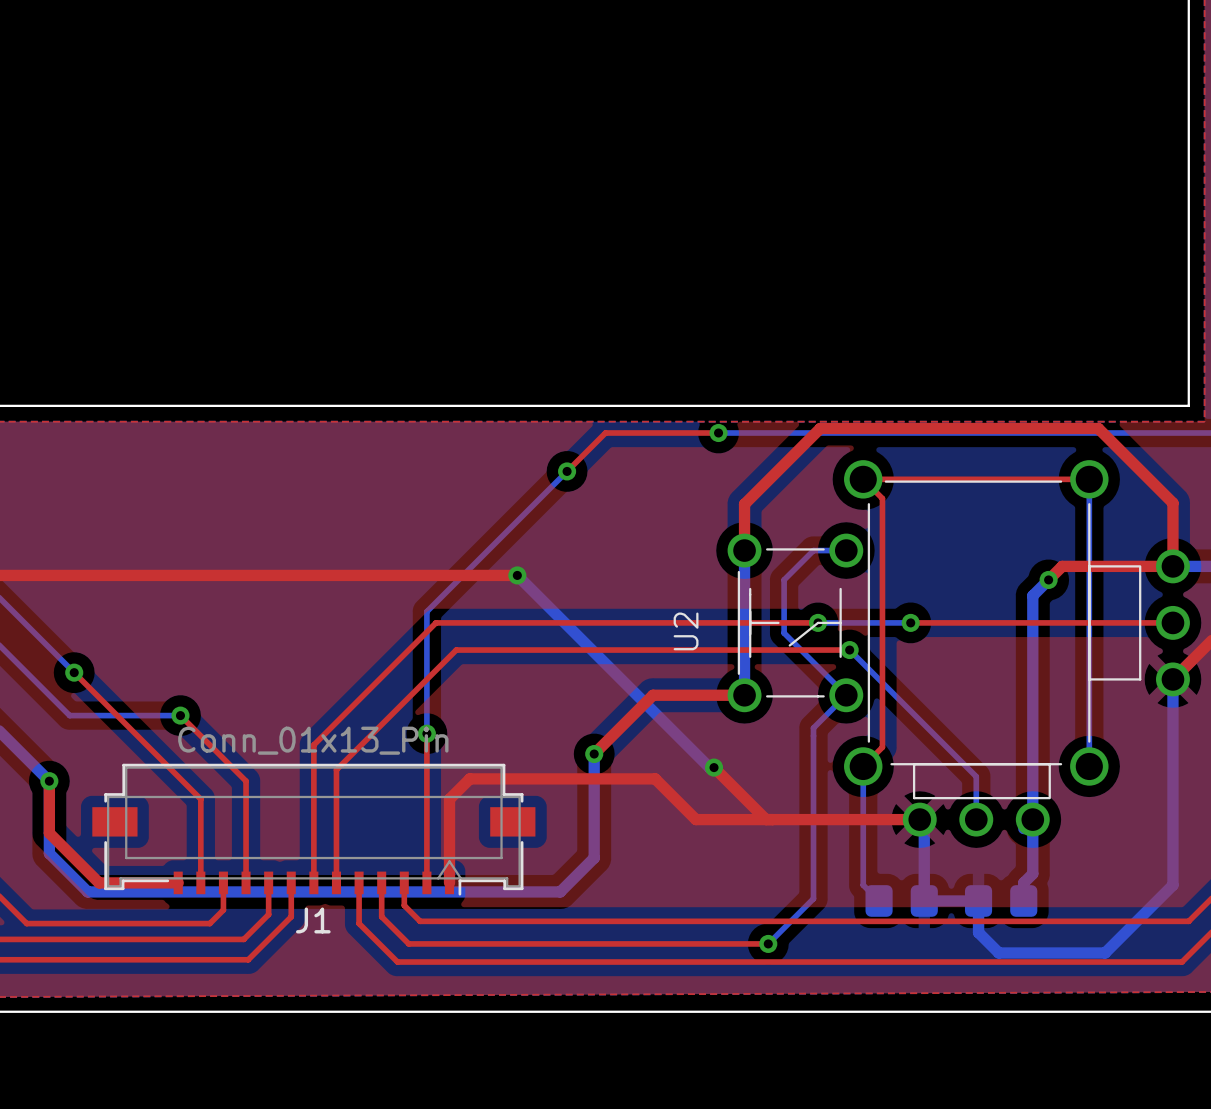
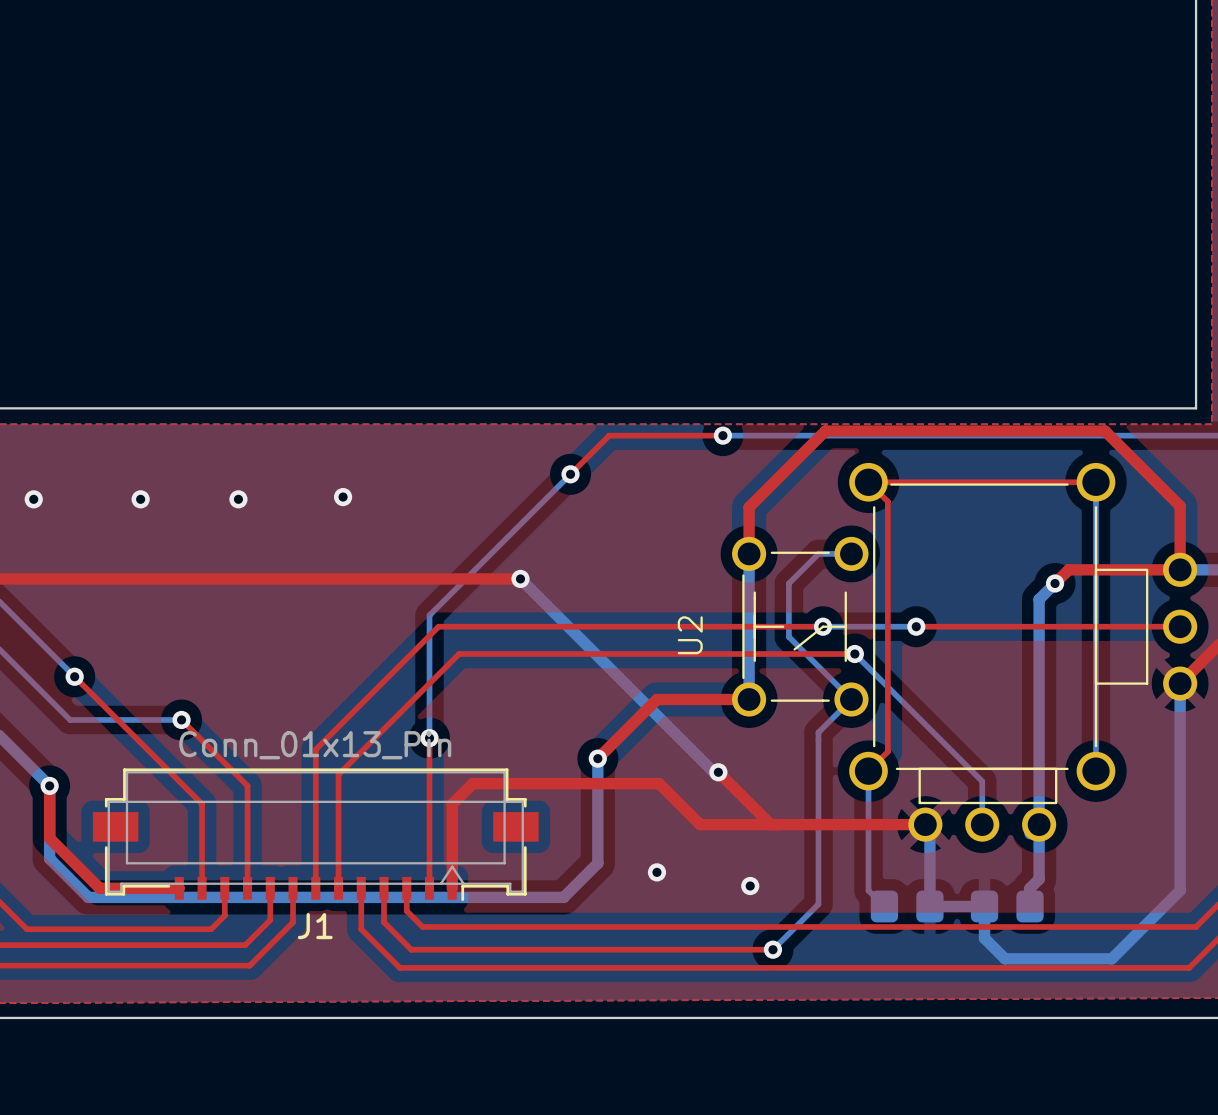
via: none -> (343, 497)
via: none -> (33, 499)
via: none -> (140, 499)
via: none -> (238, 499)
via: none -> (656, 872)
via: none -> (750, 886)

